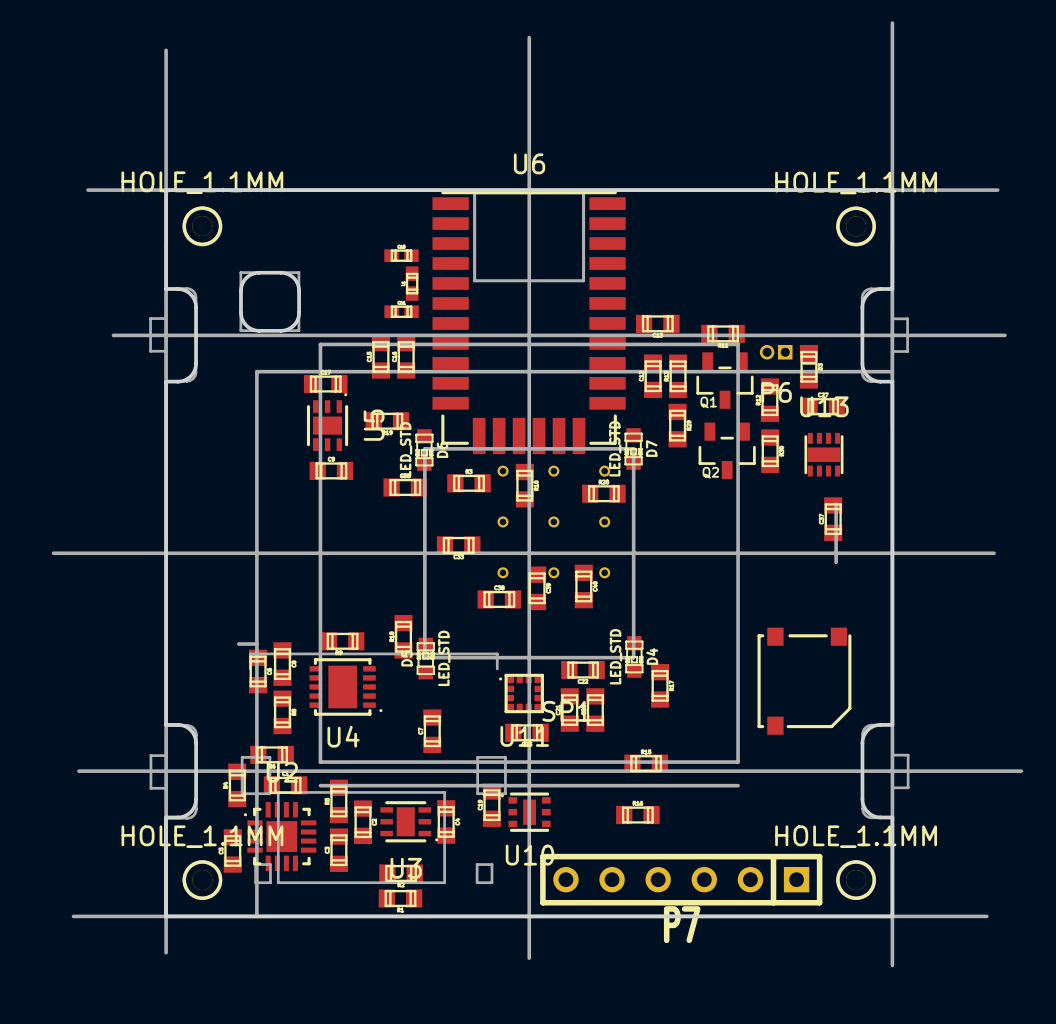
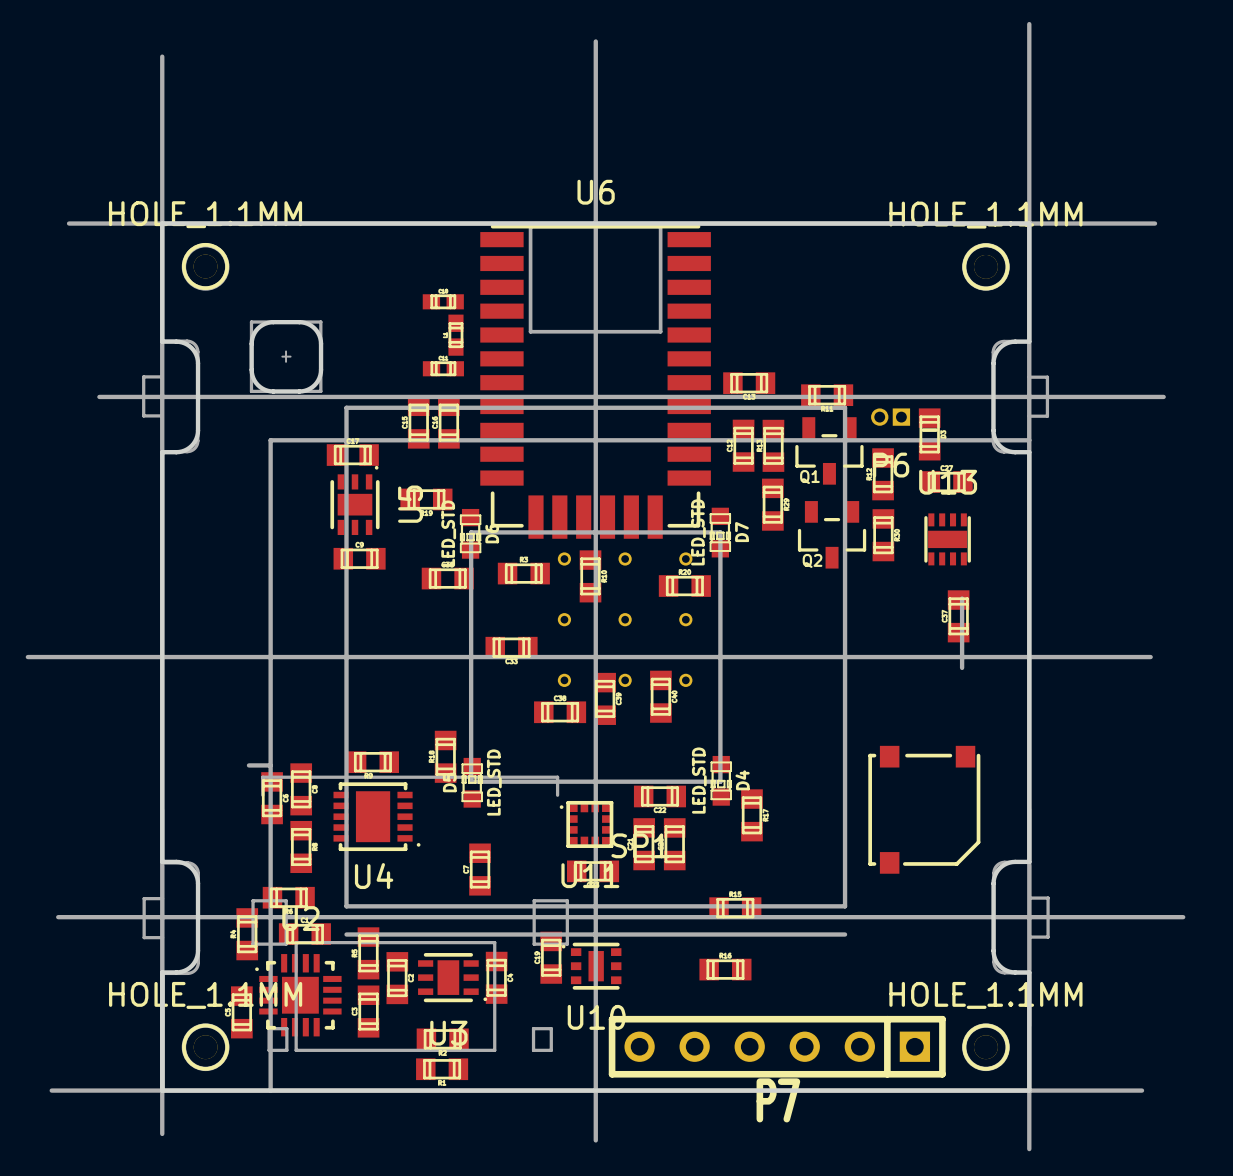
line: none -> (286, 351) (286, 361)
line: none -> (282, 356) (290, 356)

